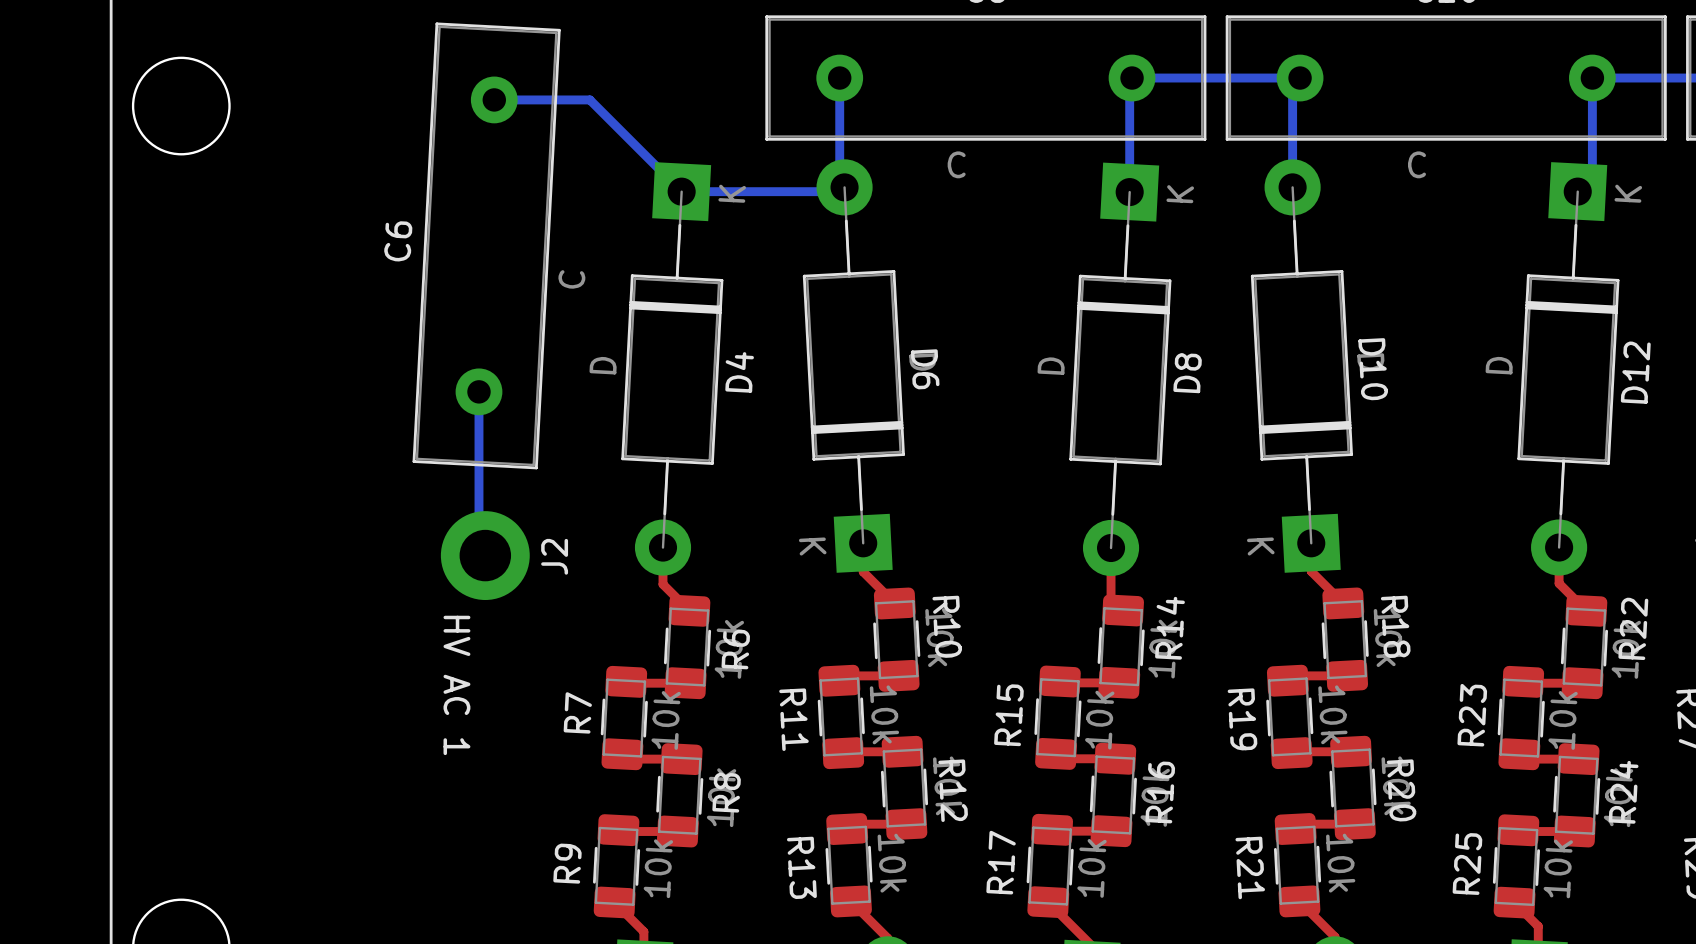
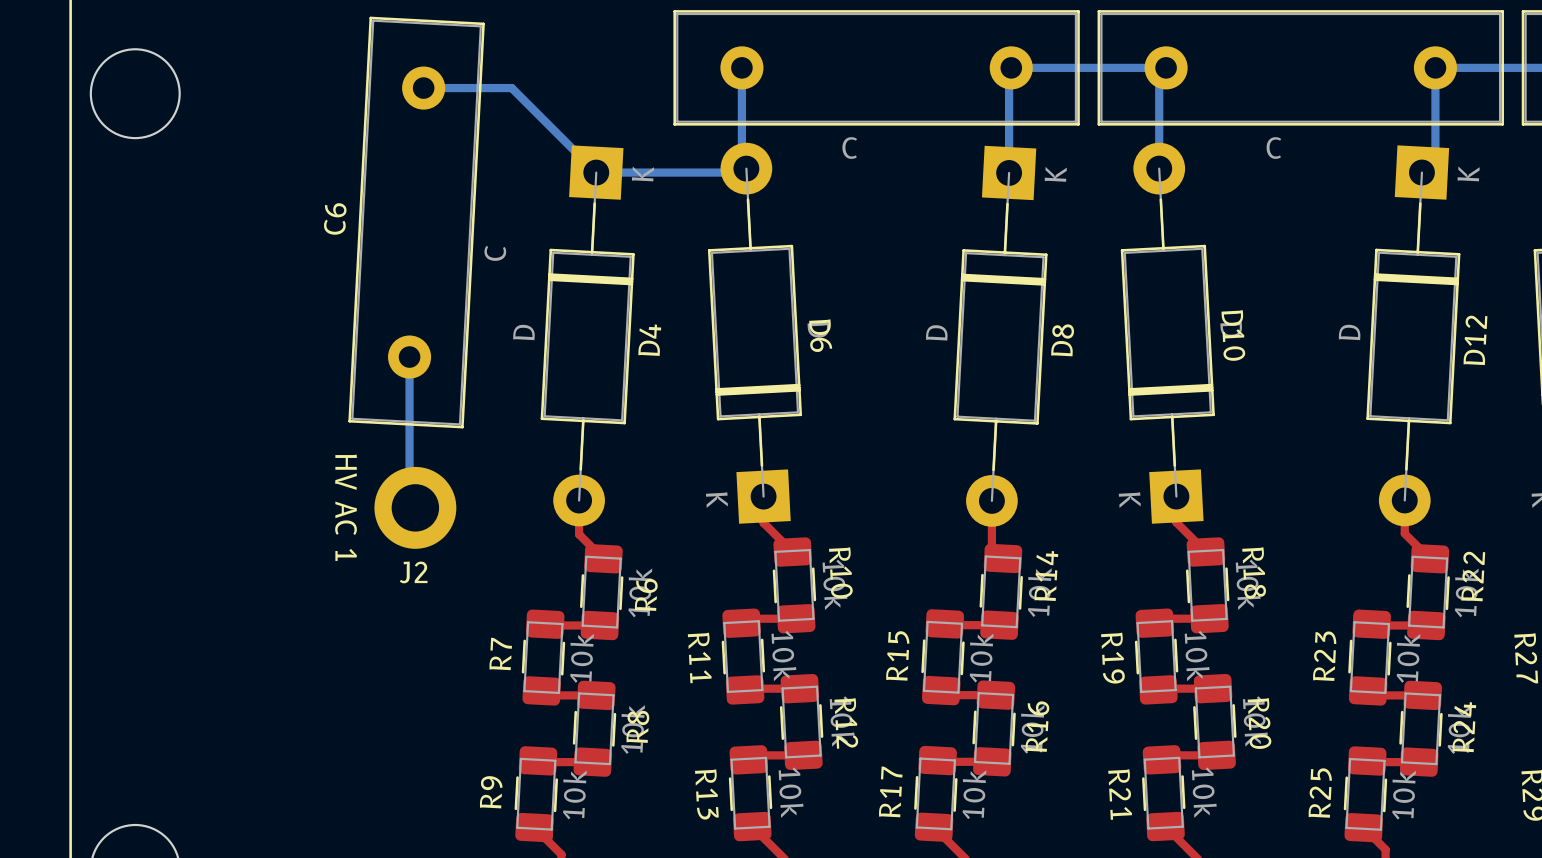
J2 name rotation: 0° (554, 556) -> 90° clockwise (413, 572)
J2 name position: J2 (554, 556) -> J2 (413, 572)
text position: HV AC 1 (456, 685) -> HV AC 1 (346, 507)

